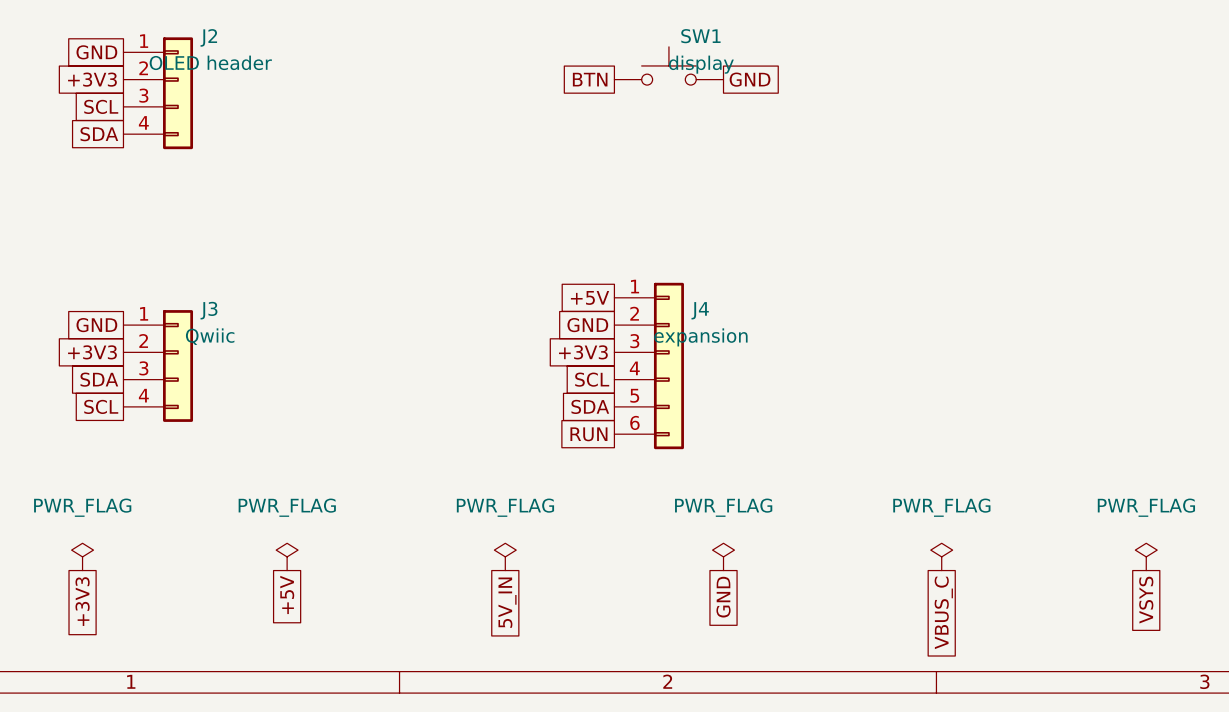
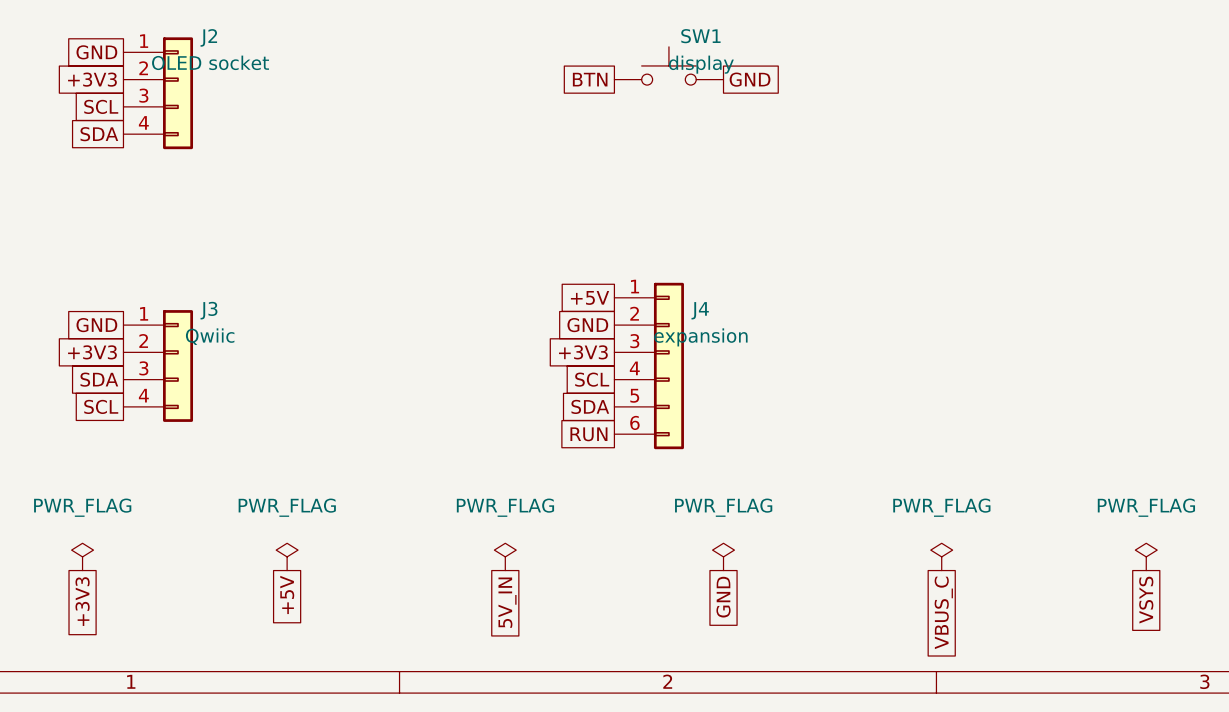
J2 value: OLED header (210, 62) -> OLED socket (210, 62)

